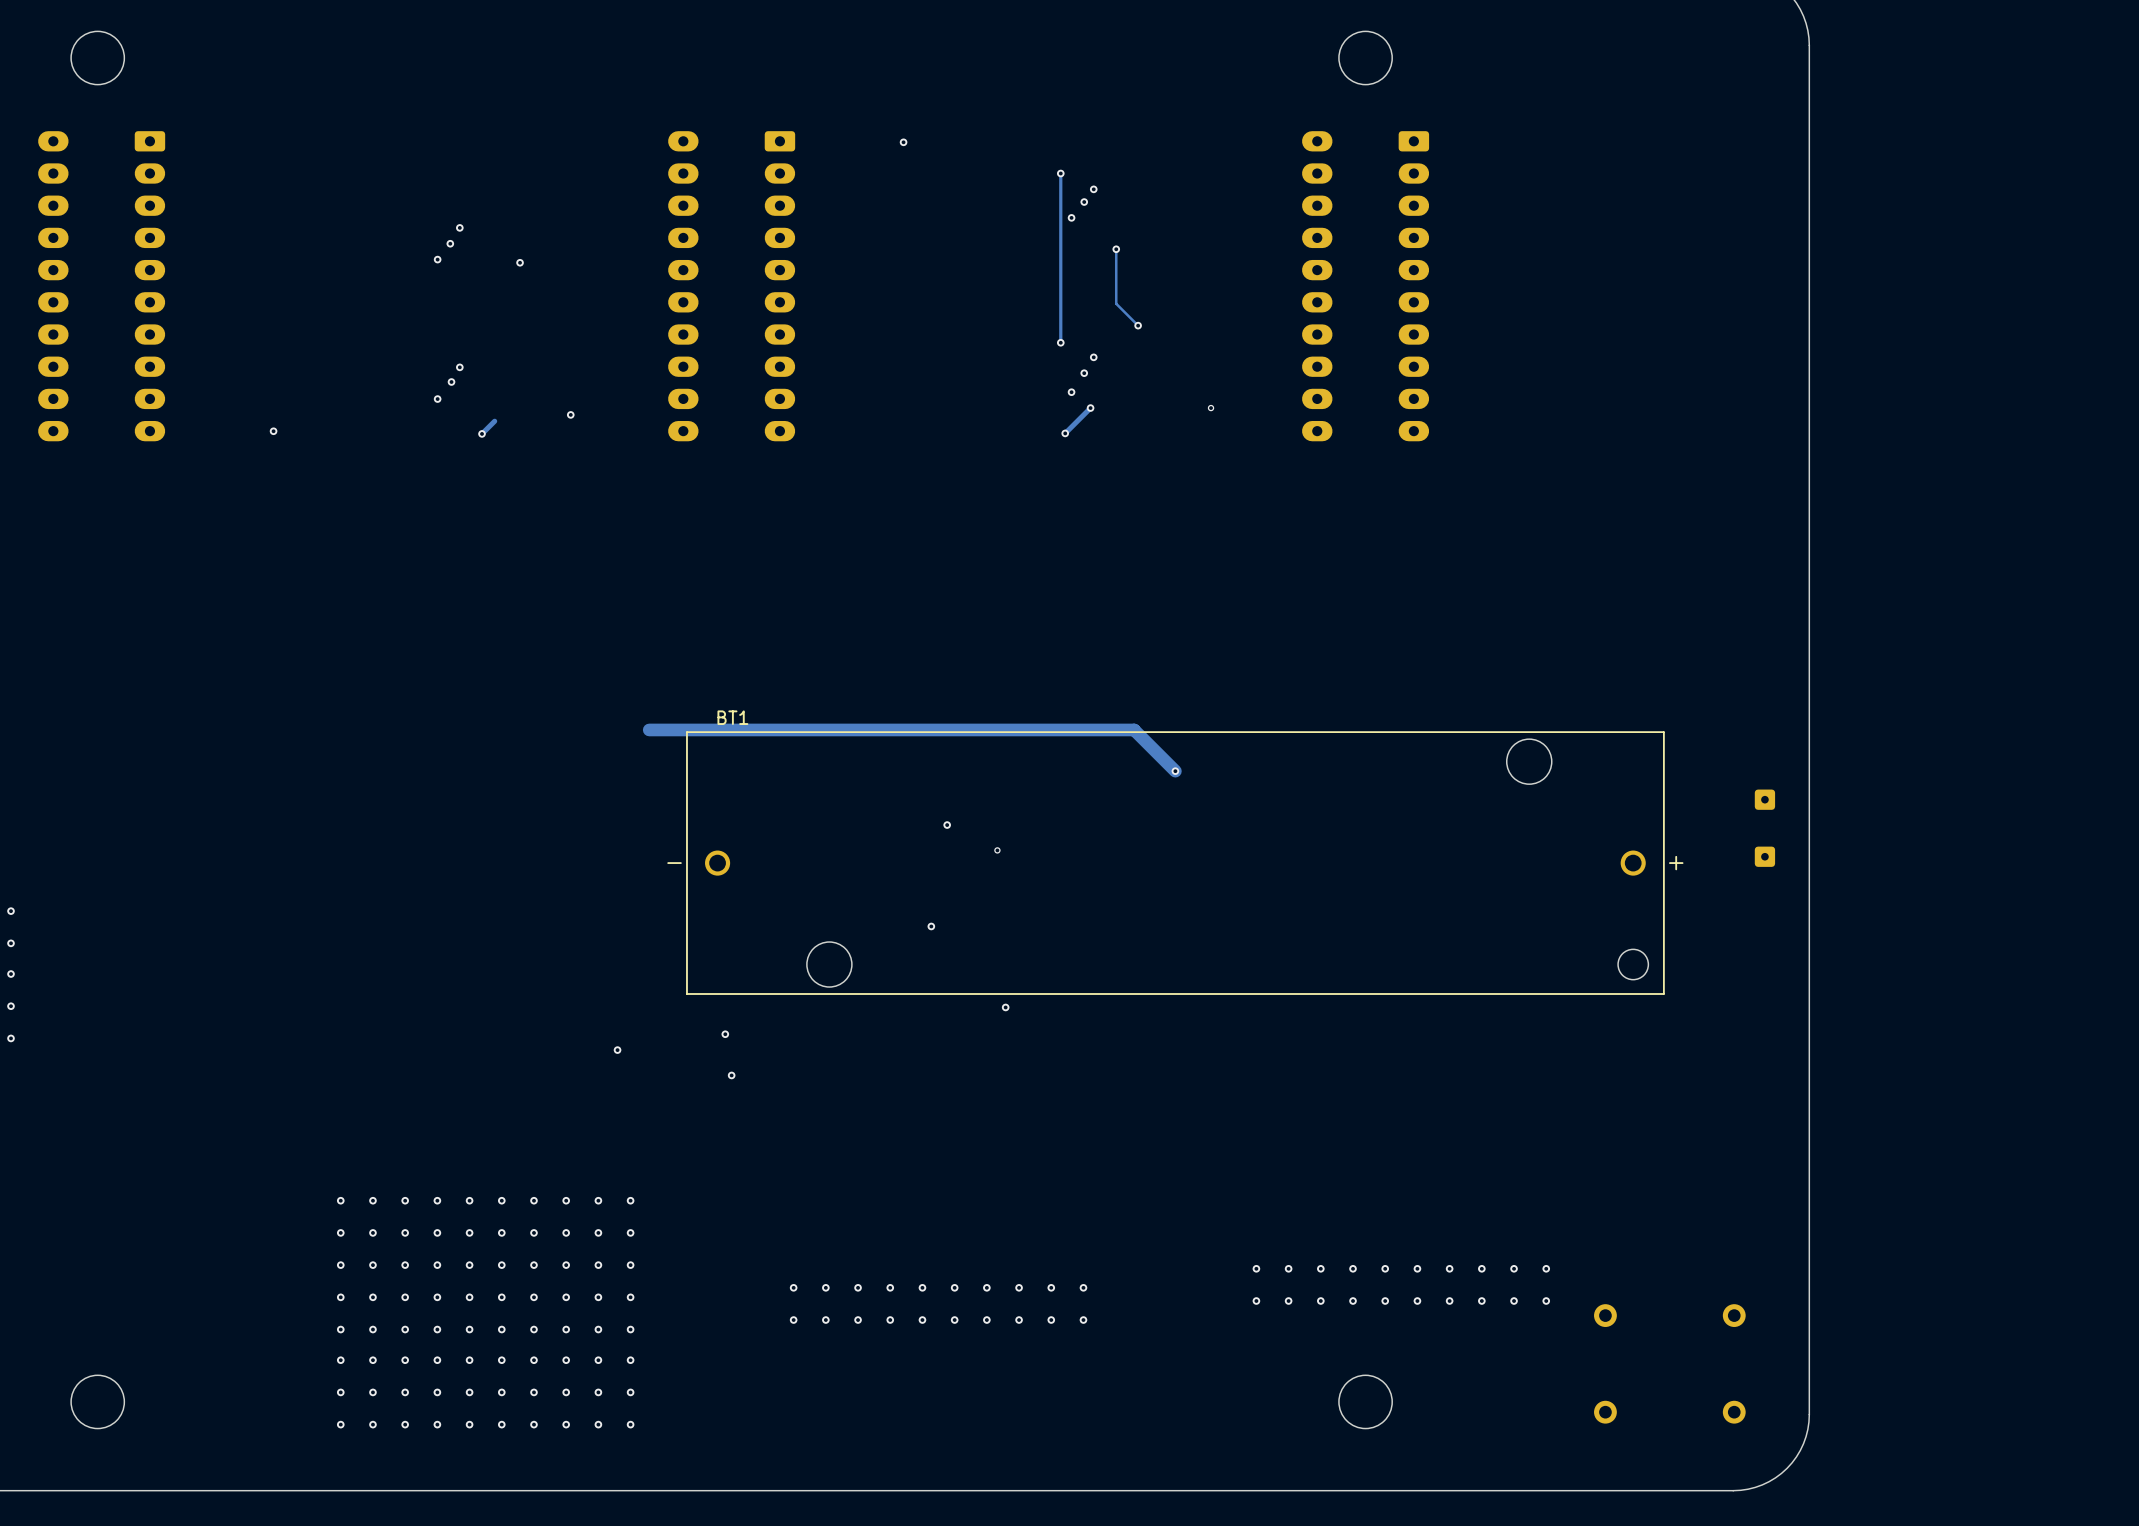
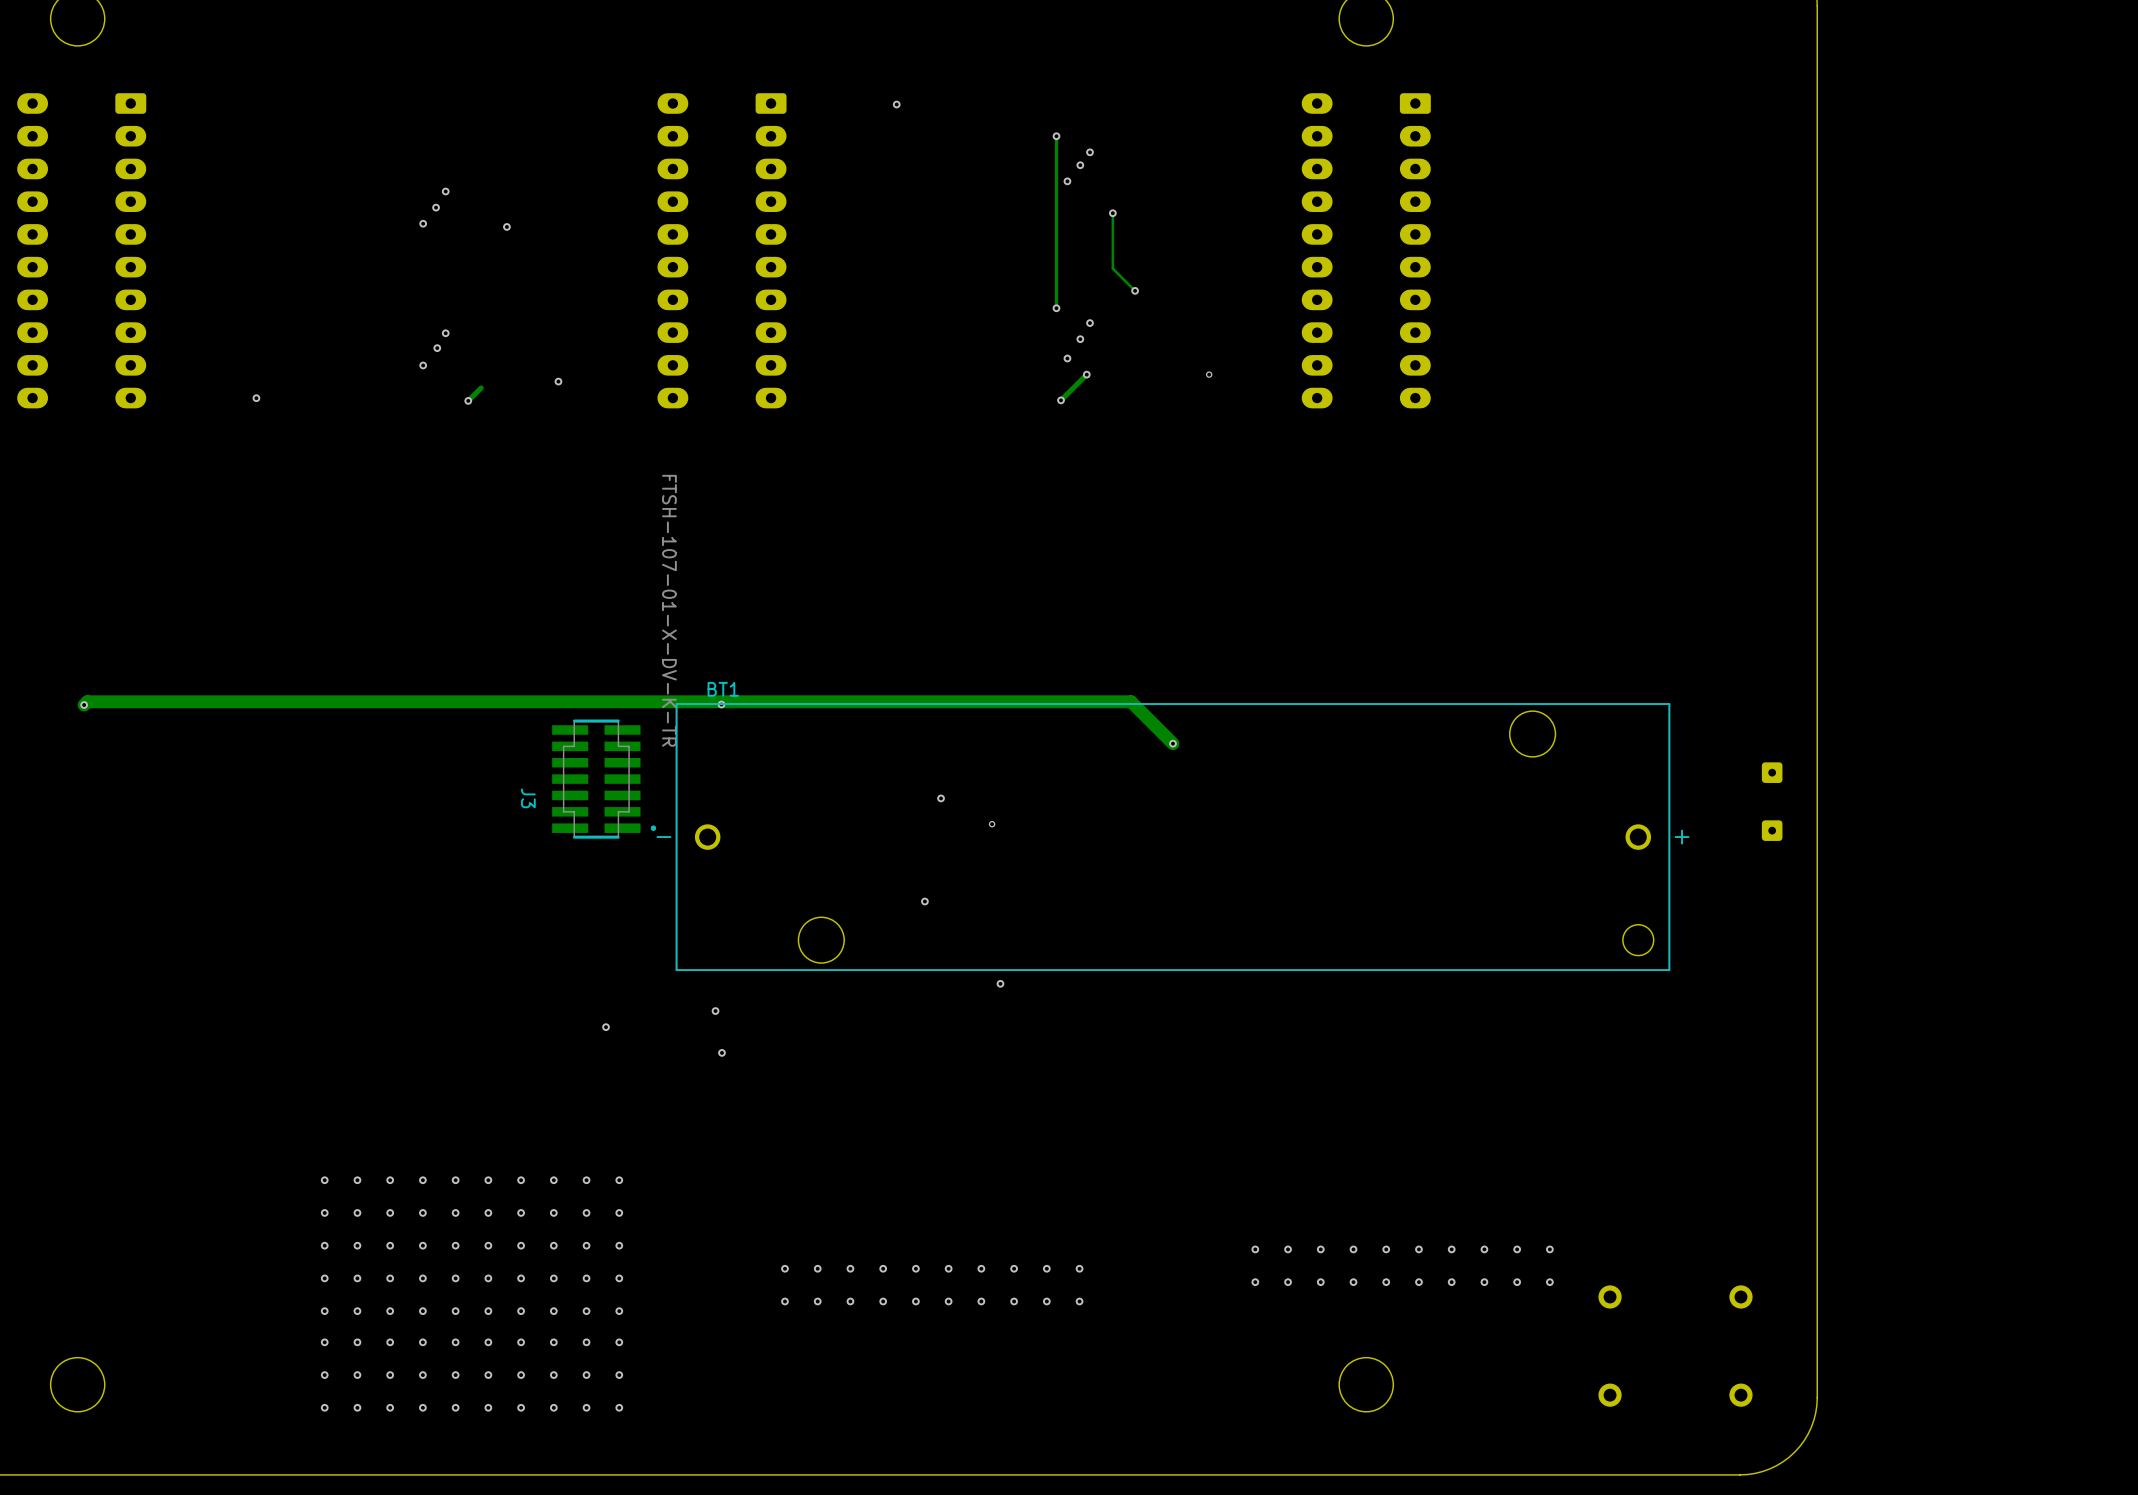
track: none -> (638, 701) (87, 701) (84, 705)
via: none -> (721, 704)
via: none -> (84, 705)
J3: none -> FTSH-107-01-X-DV-K-TR (604, 779)

